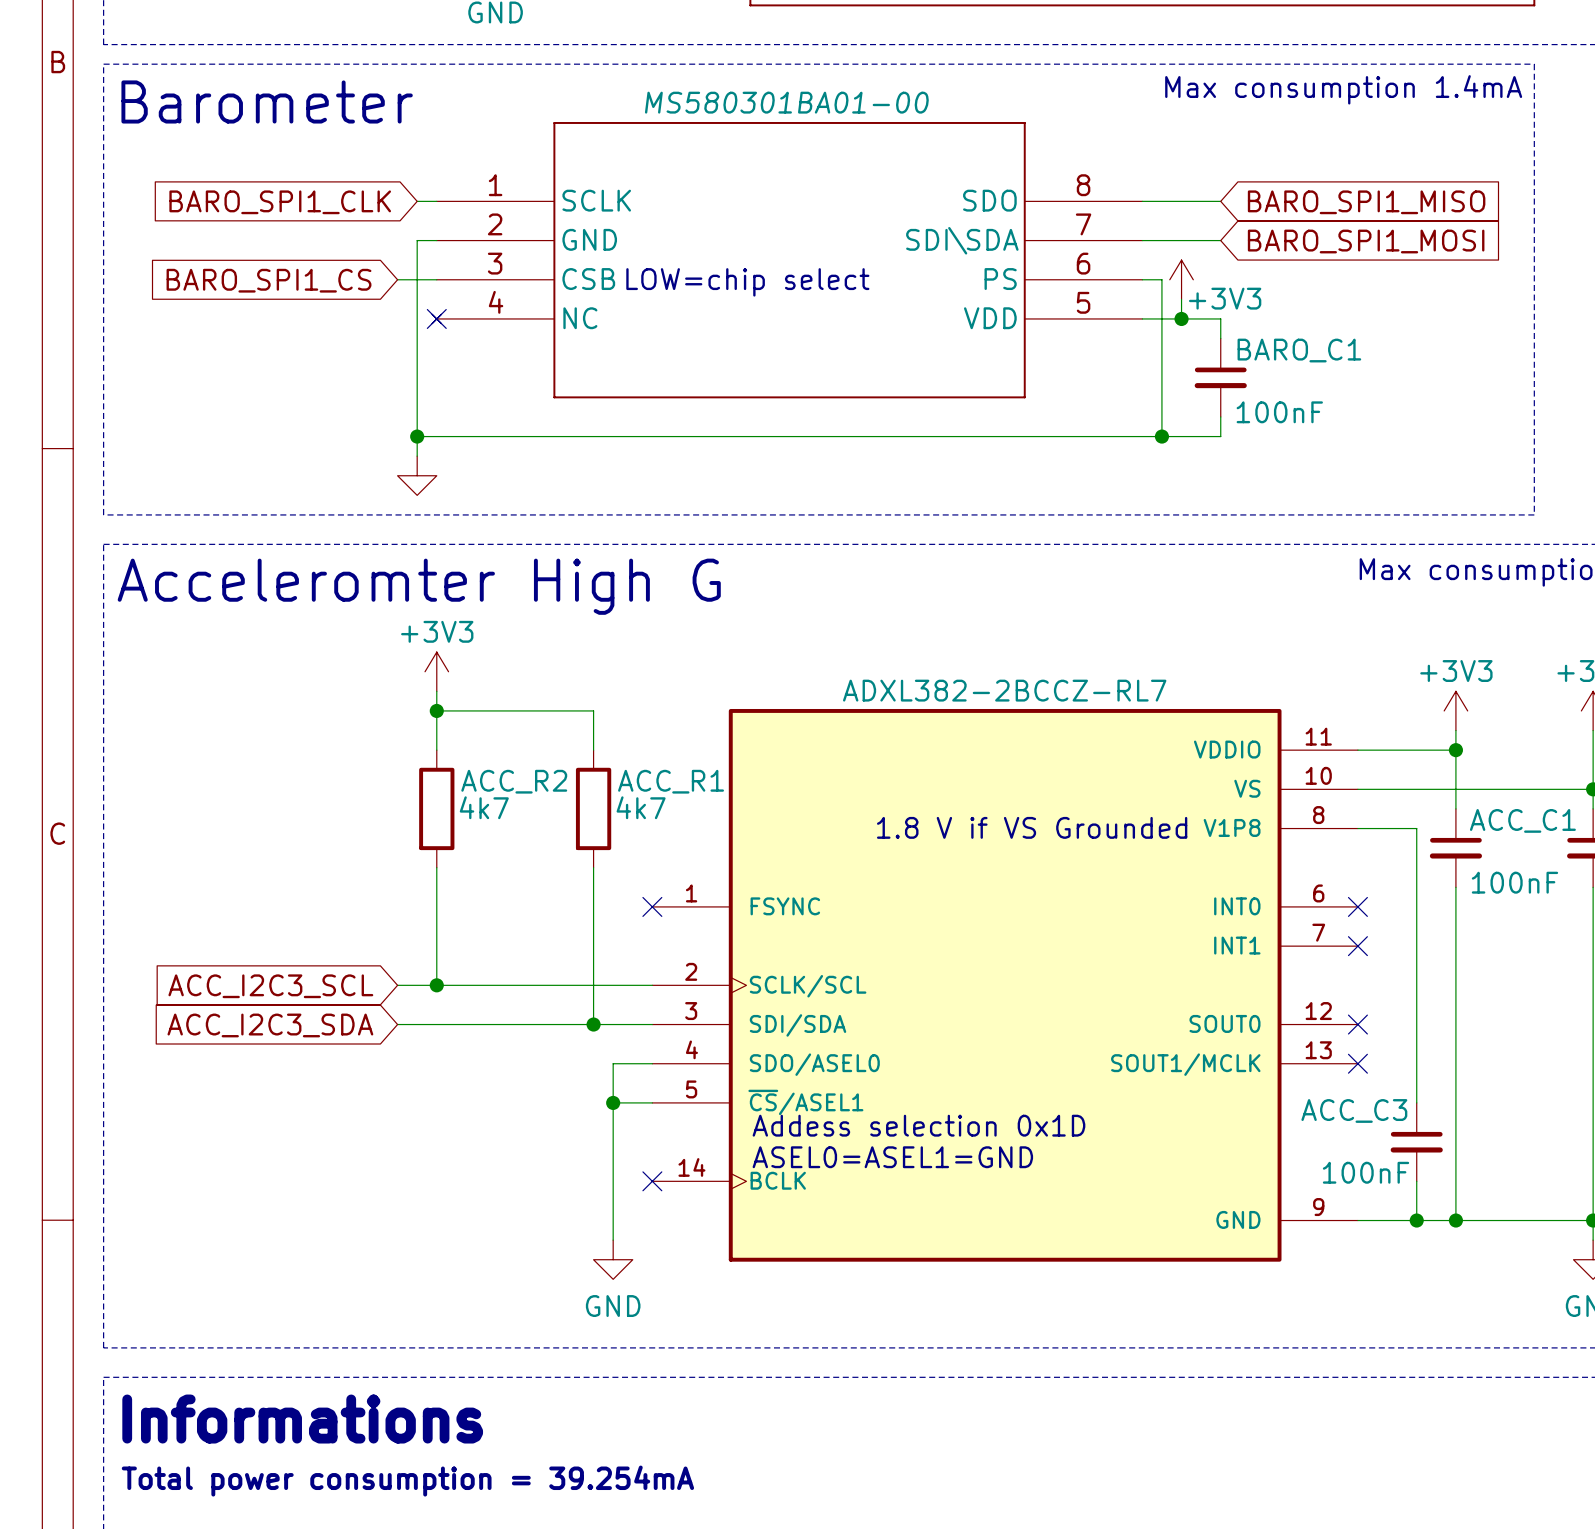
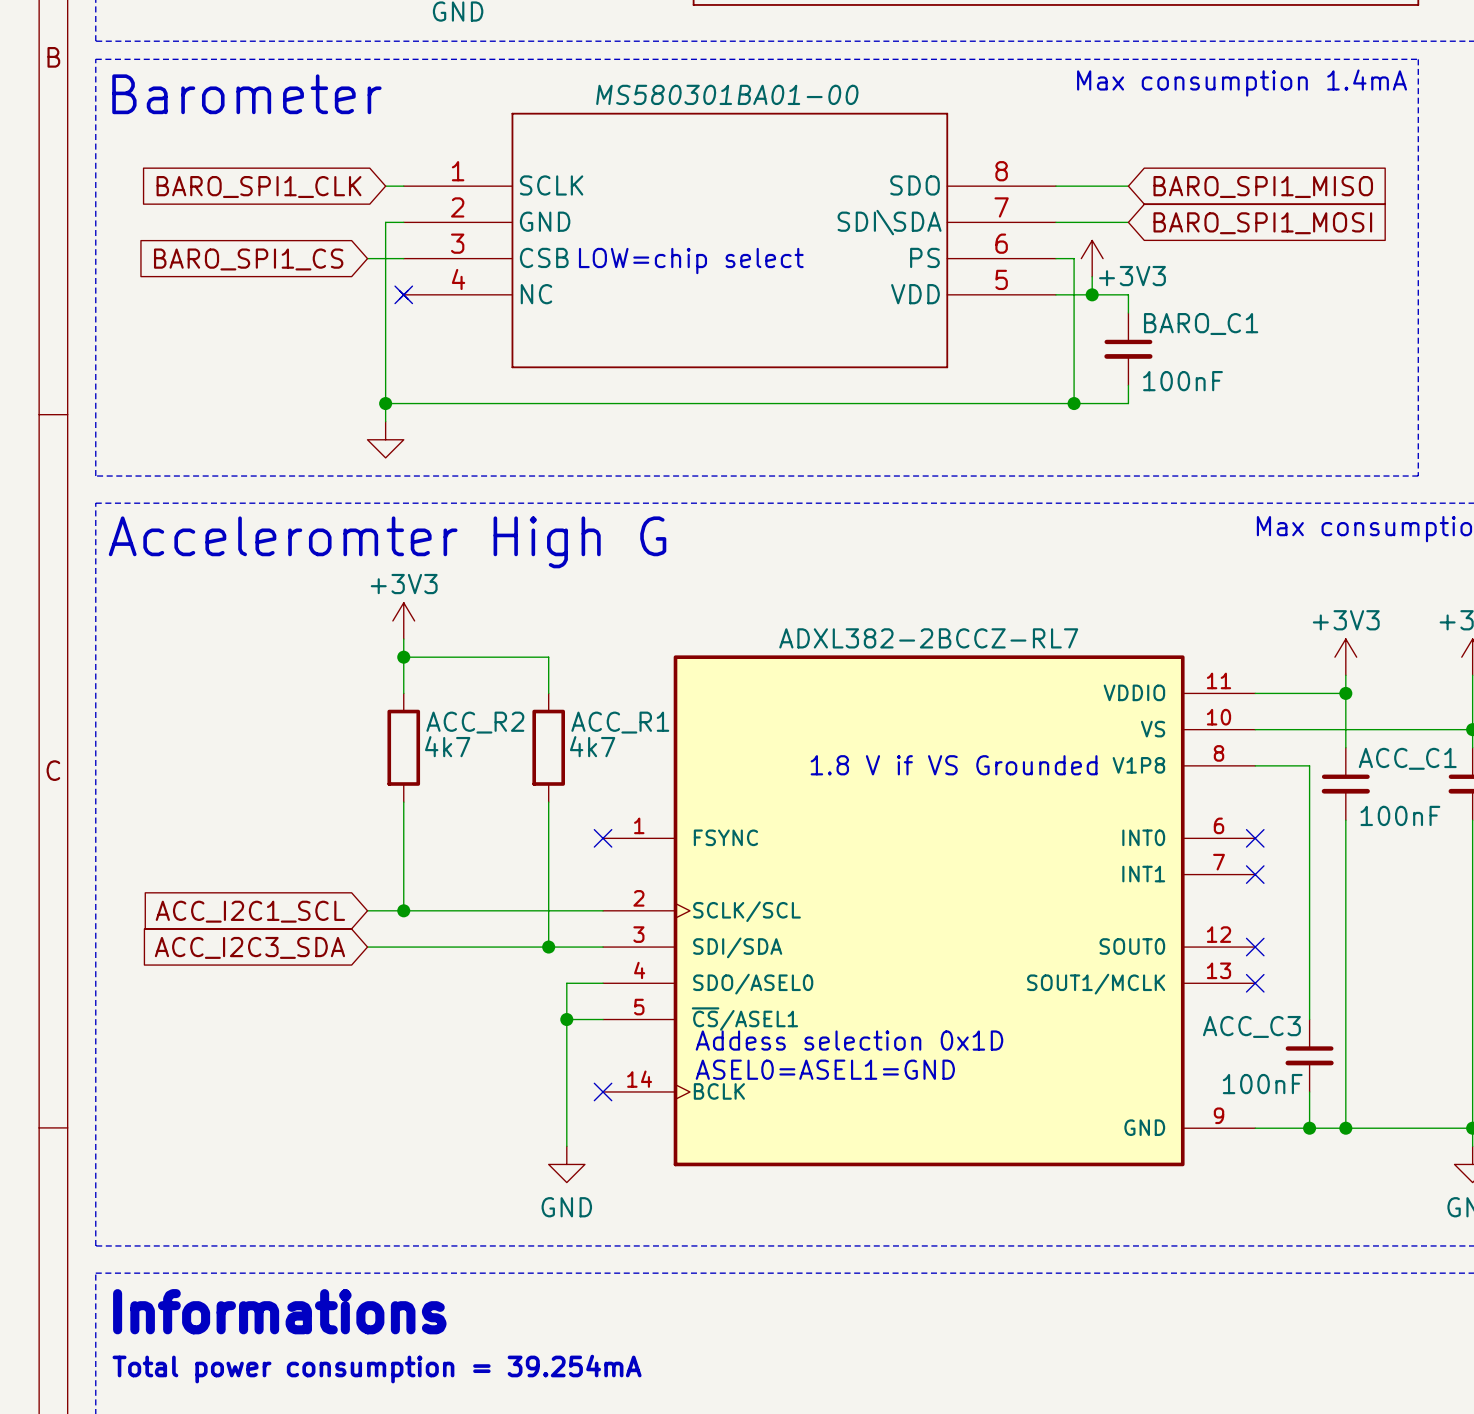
global label: ACC_I2C3_SCL (270, 986) -> ACC_I2C1_SCL (250, 911)

